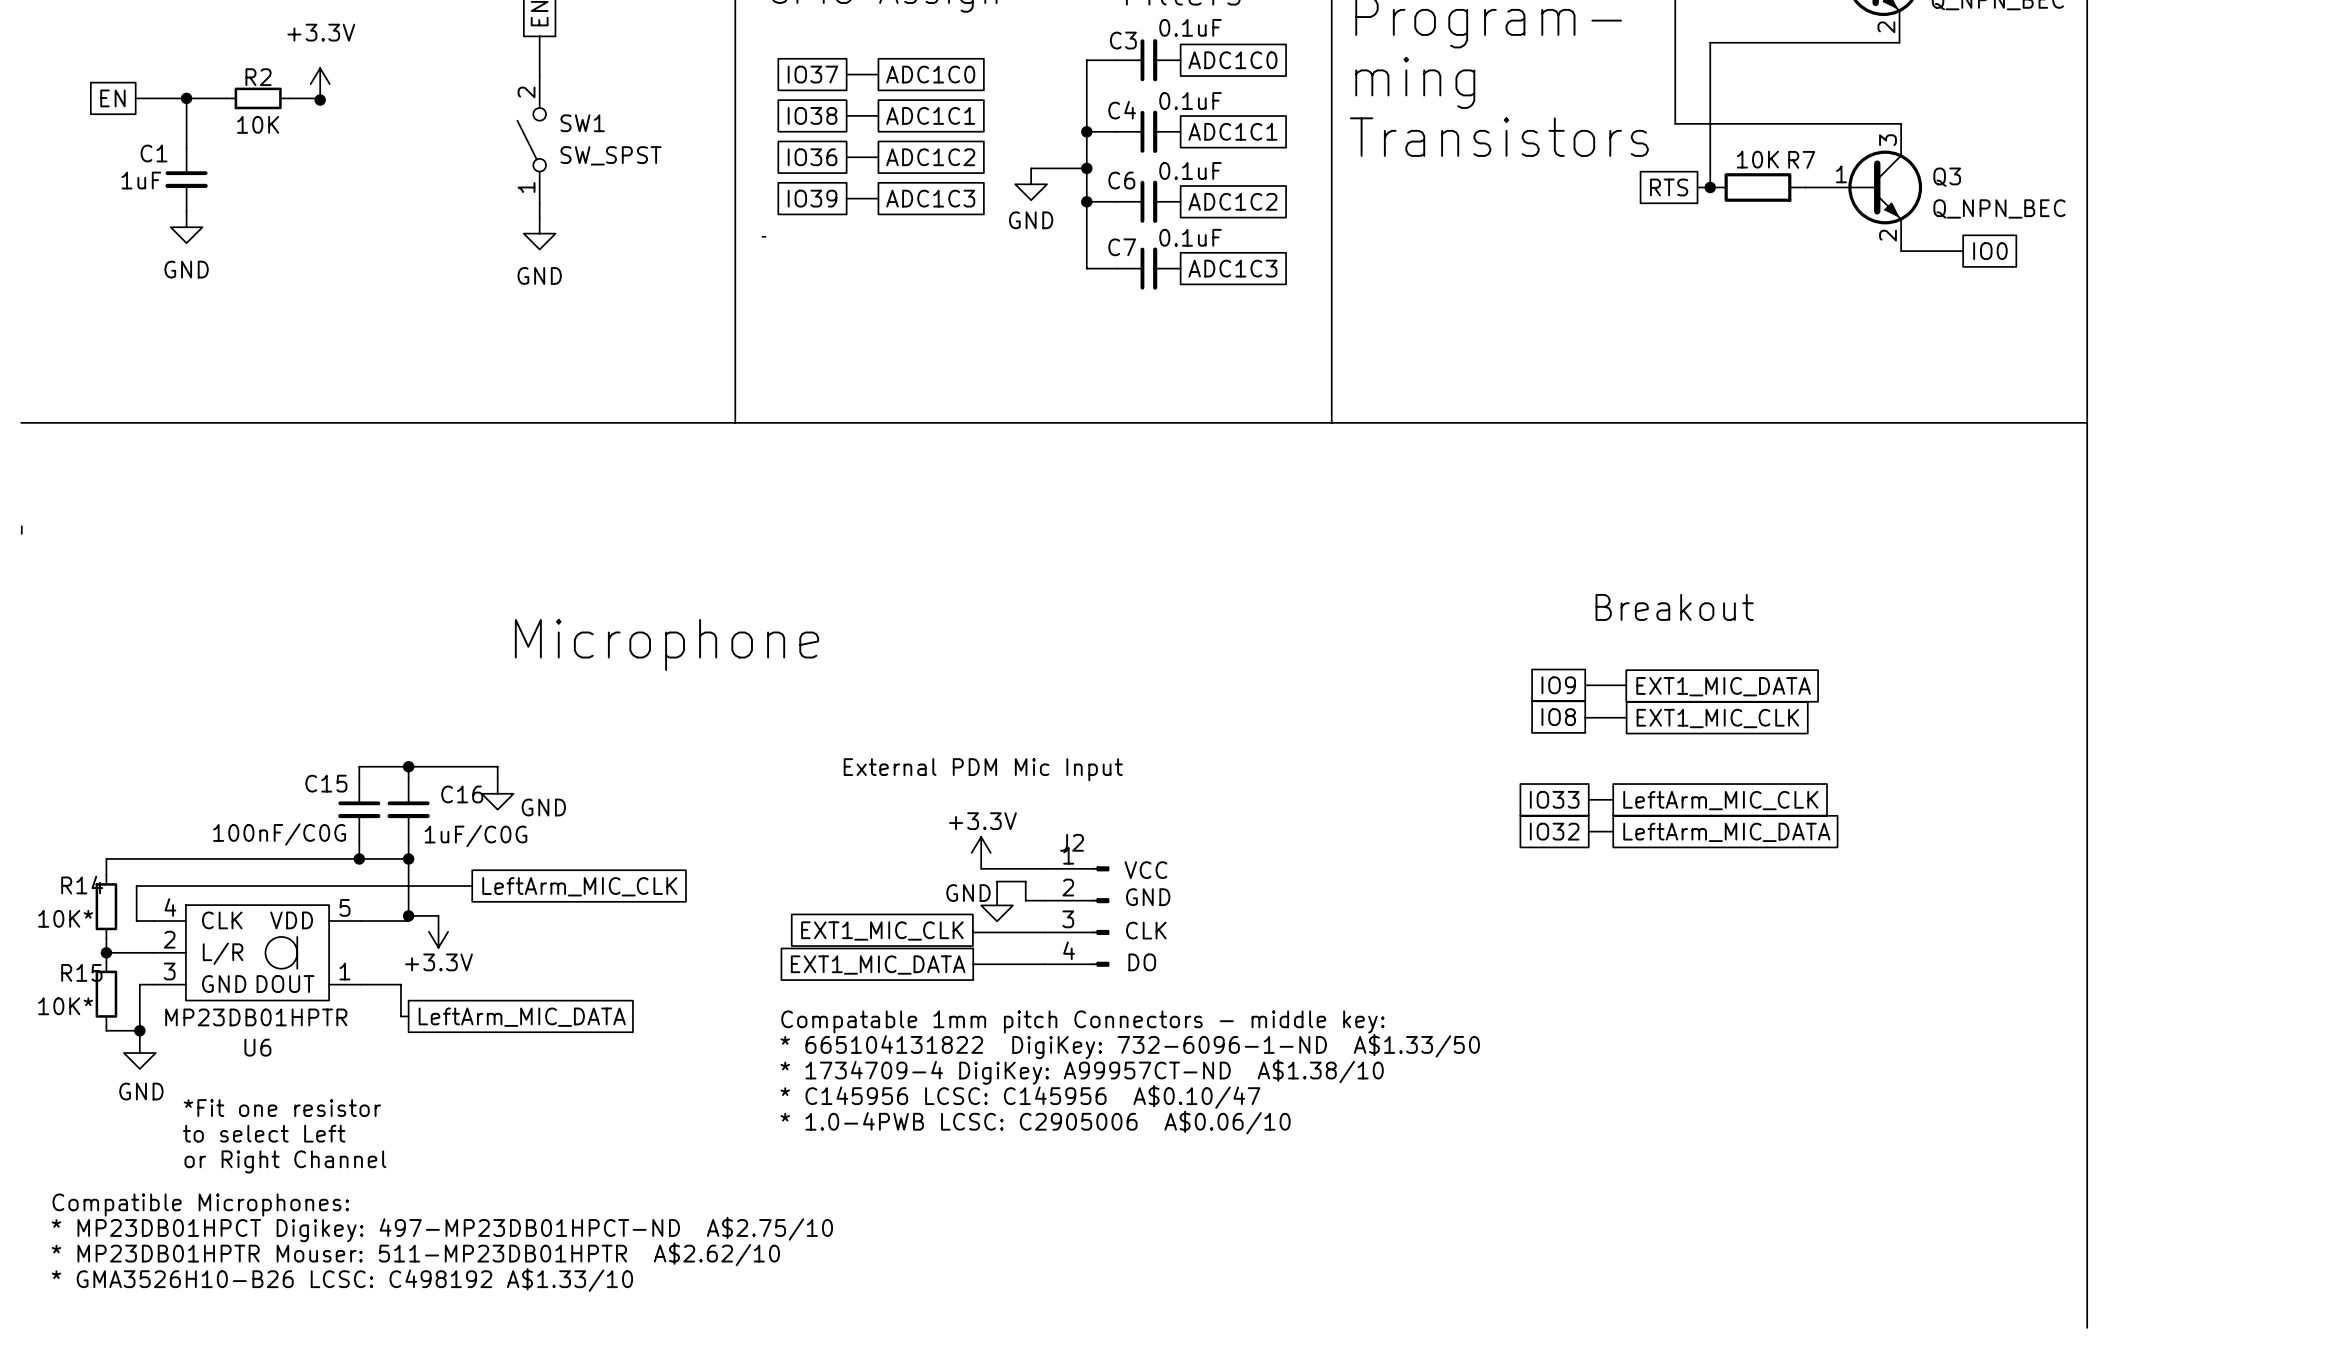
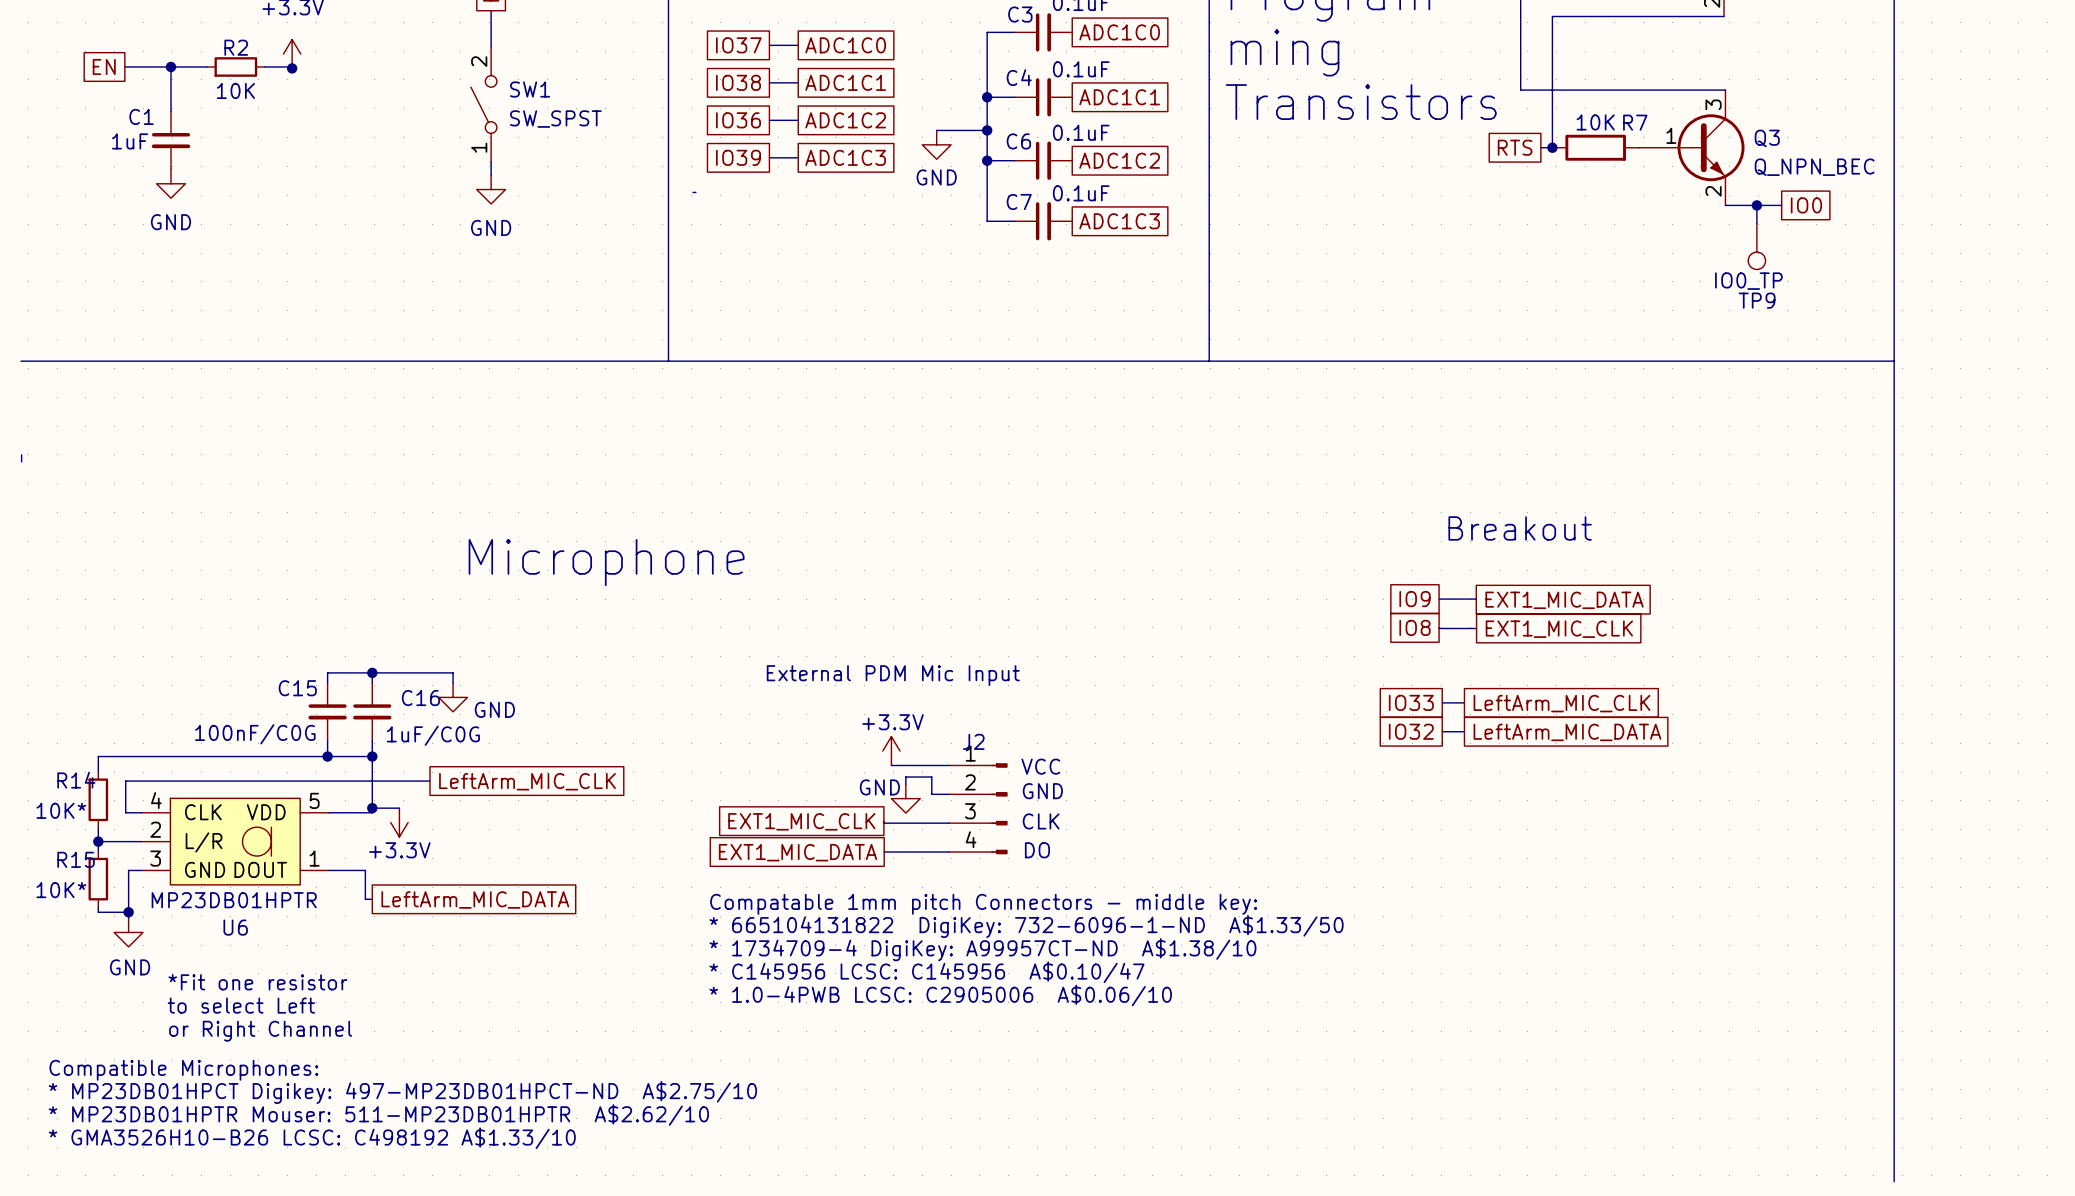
wire: none -> (1756, 205) (1756, 223)
junction: none -> (1756, 205)
TP9: none -> IO0_TP (1756, 246)

